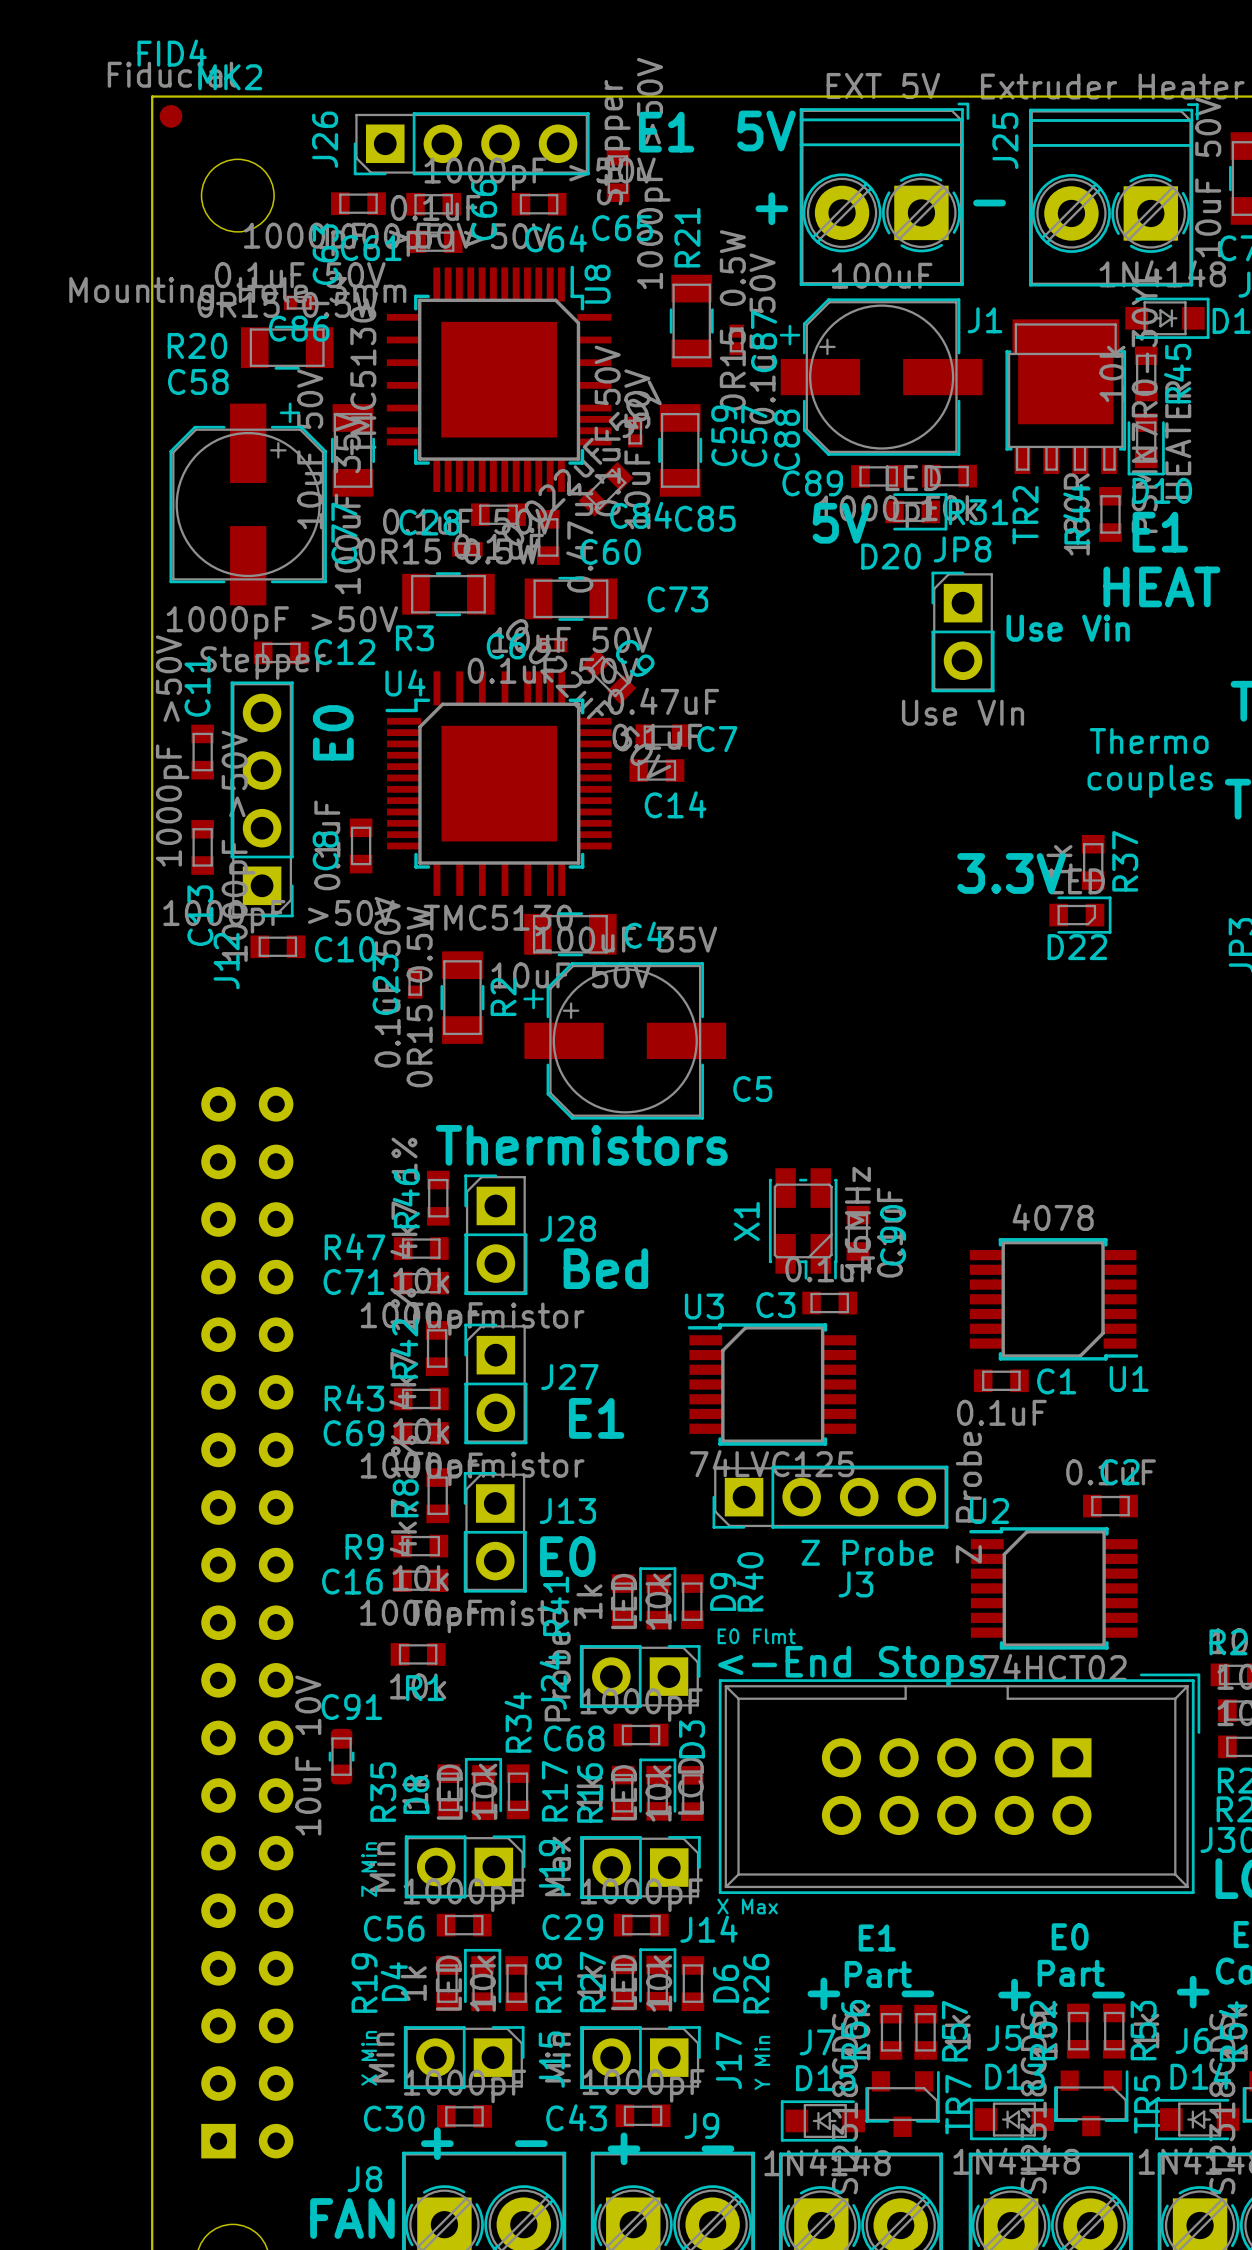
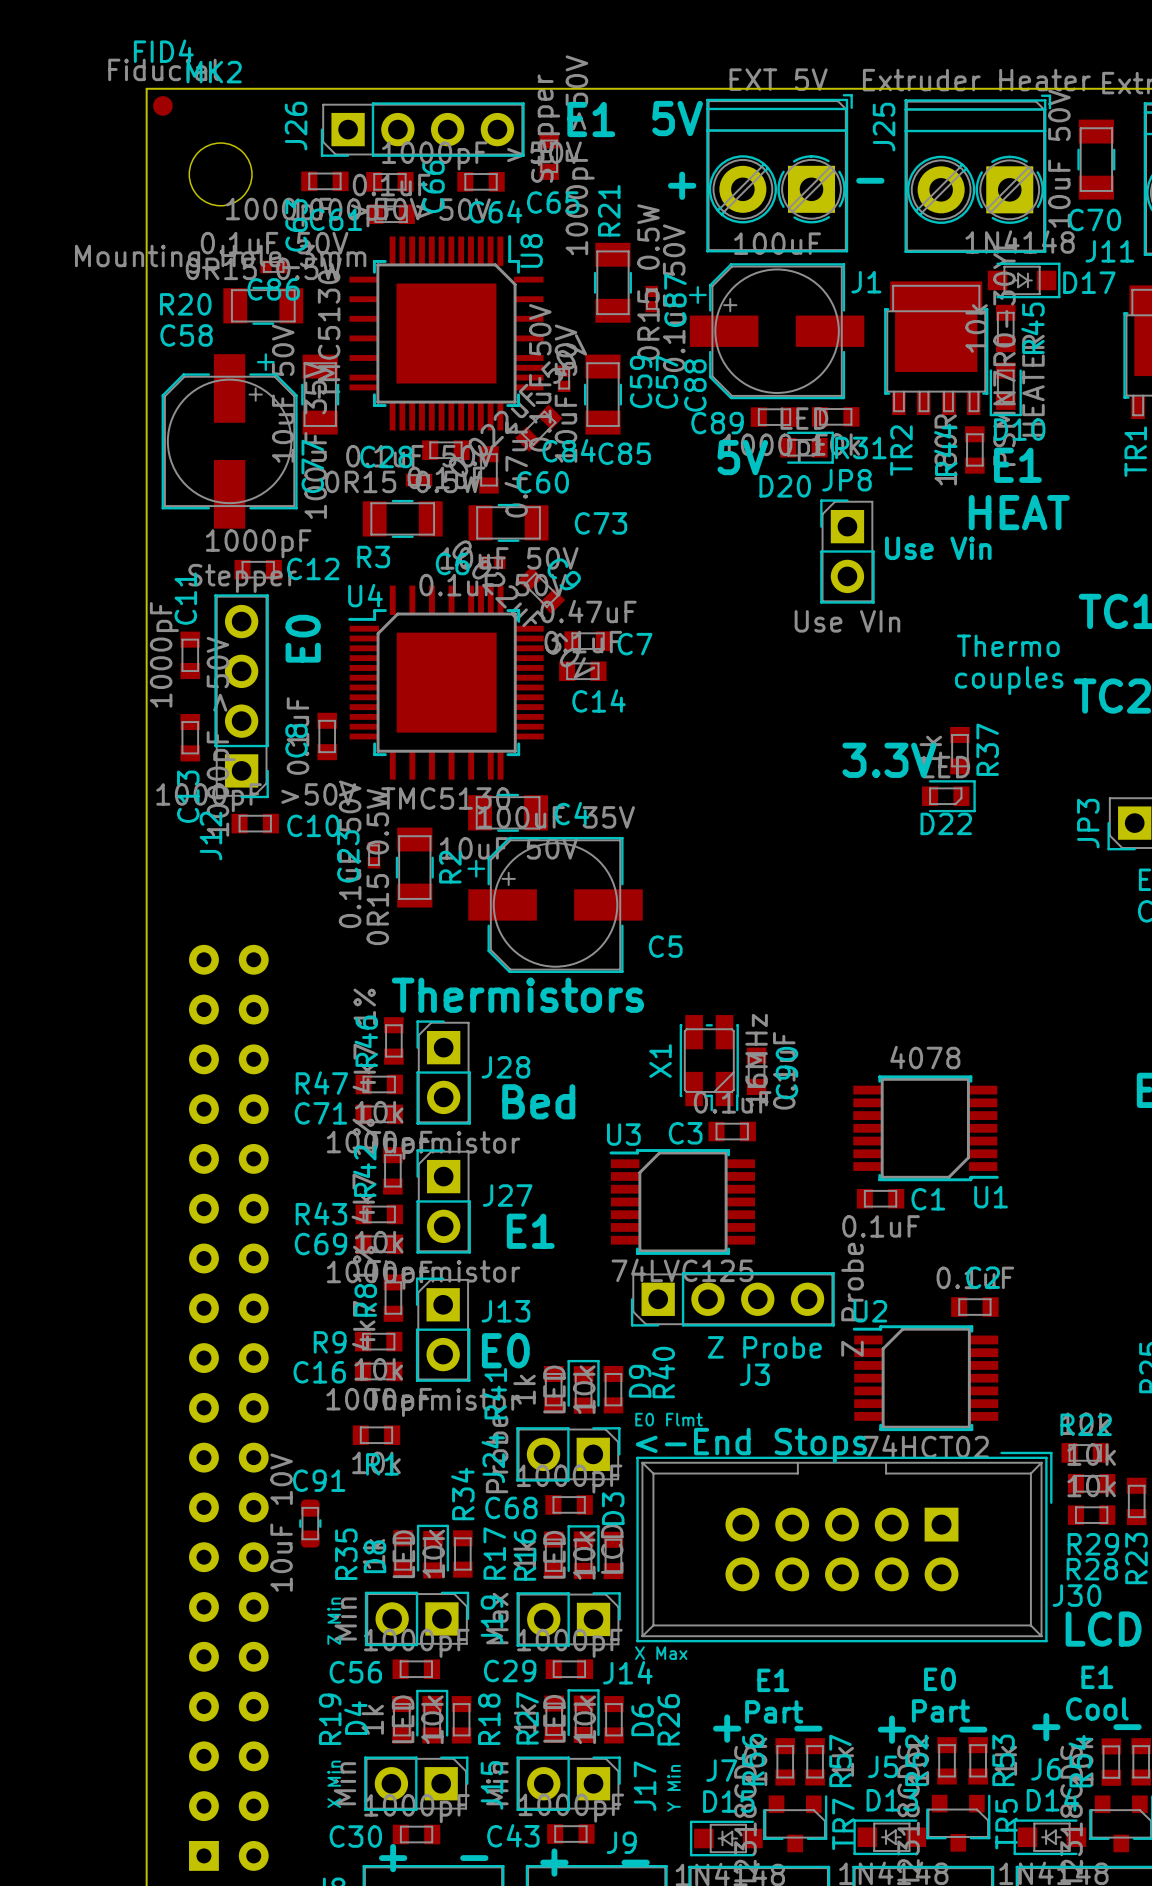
C12 value: 1000pF >50V (282, 623) -> 1000pF (258, 543)
C11 value: 1000pF >50V (172, 750) -> 1000pF (164, 654)

